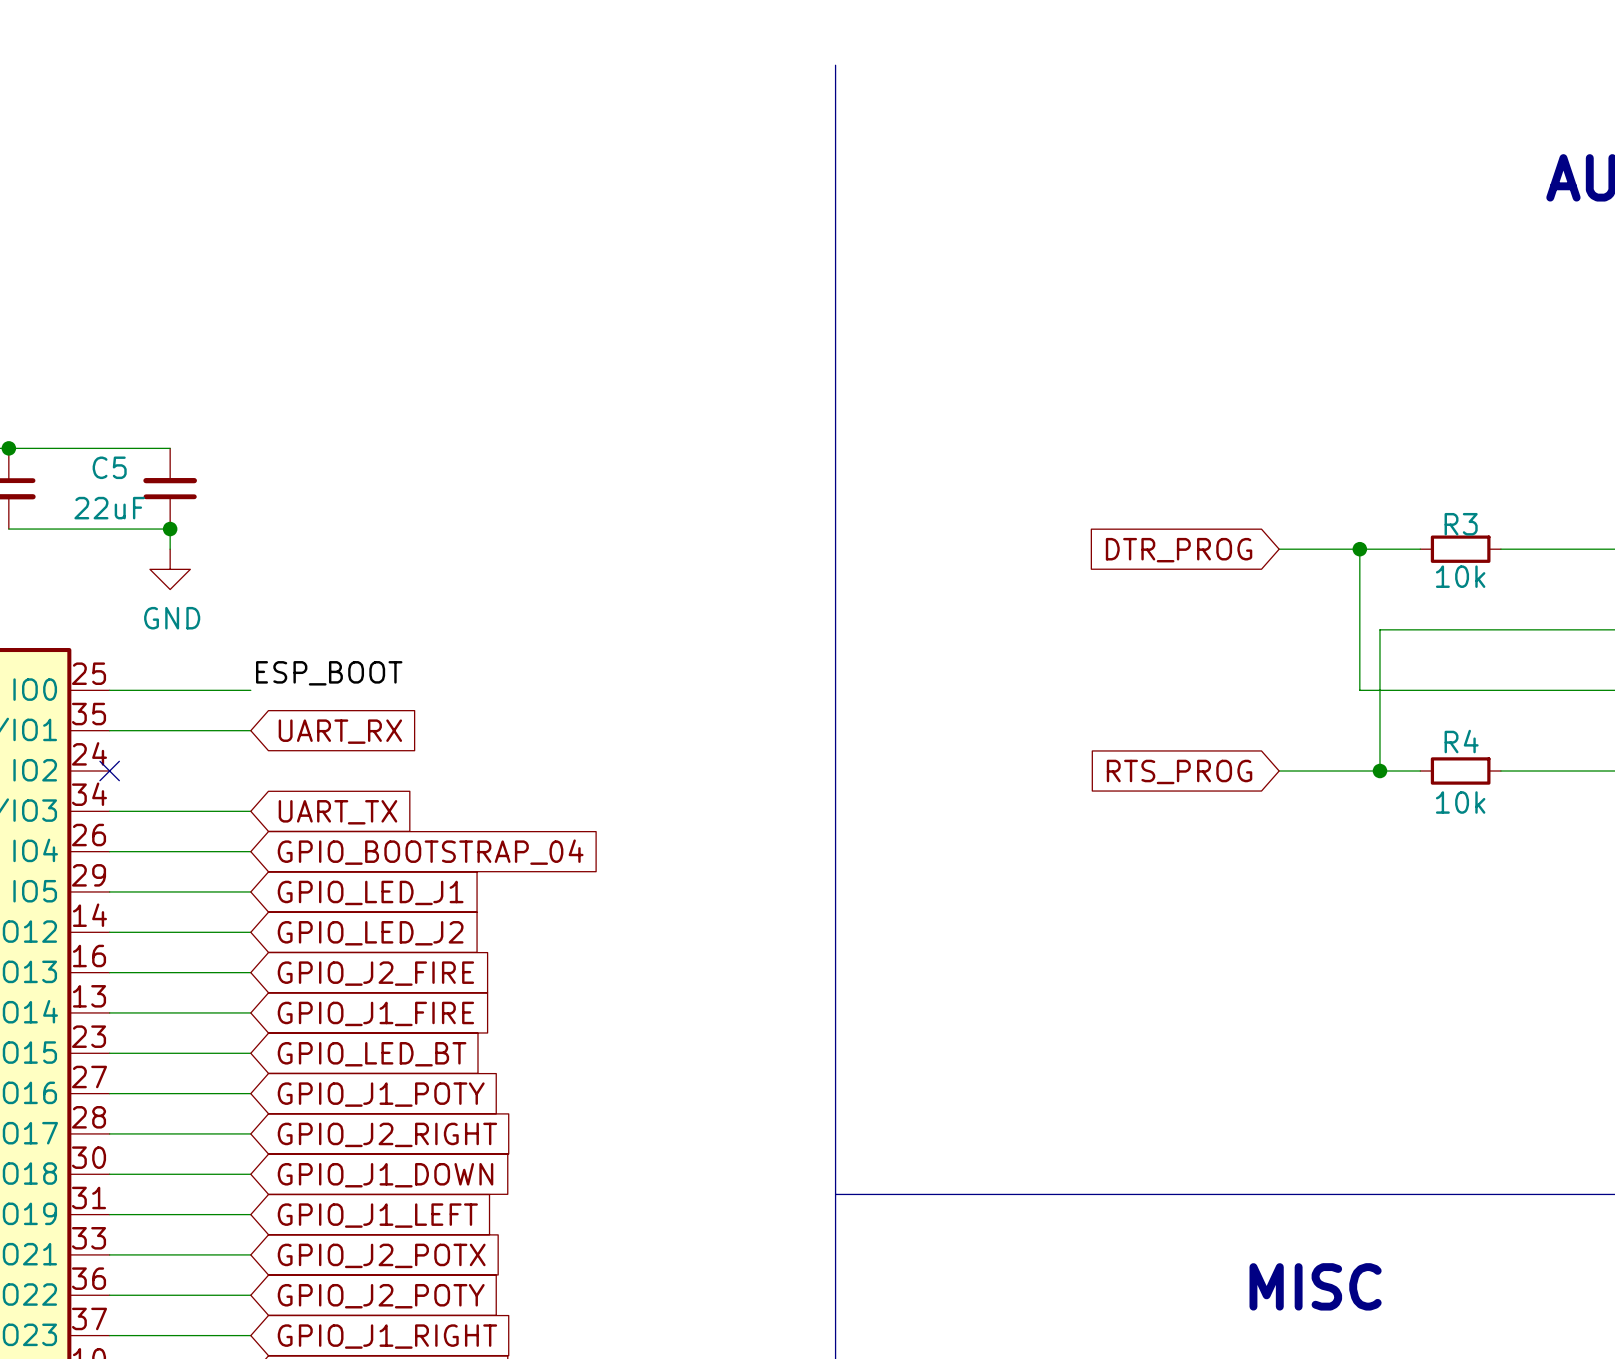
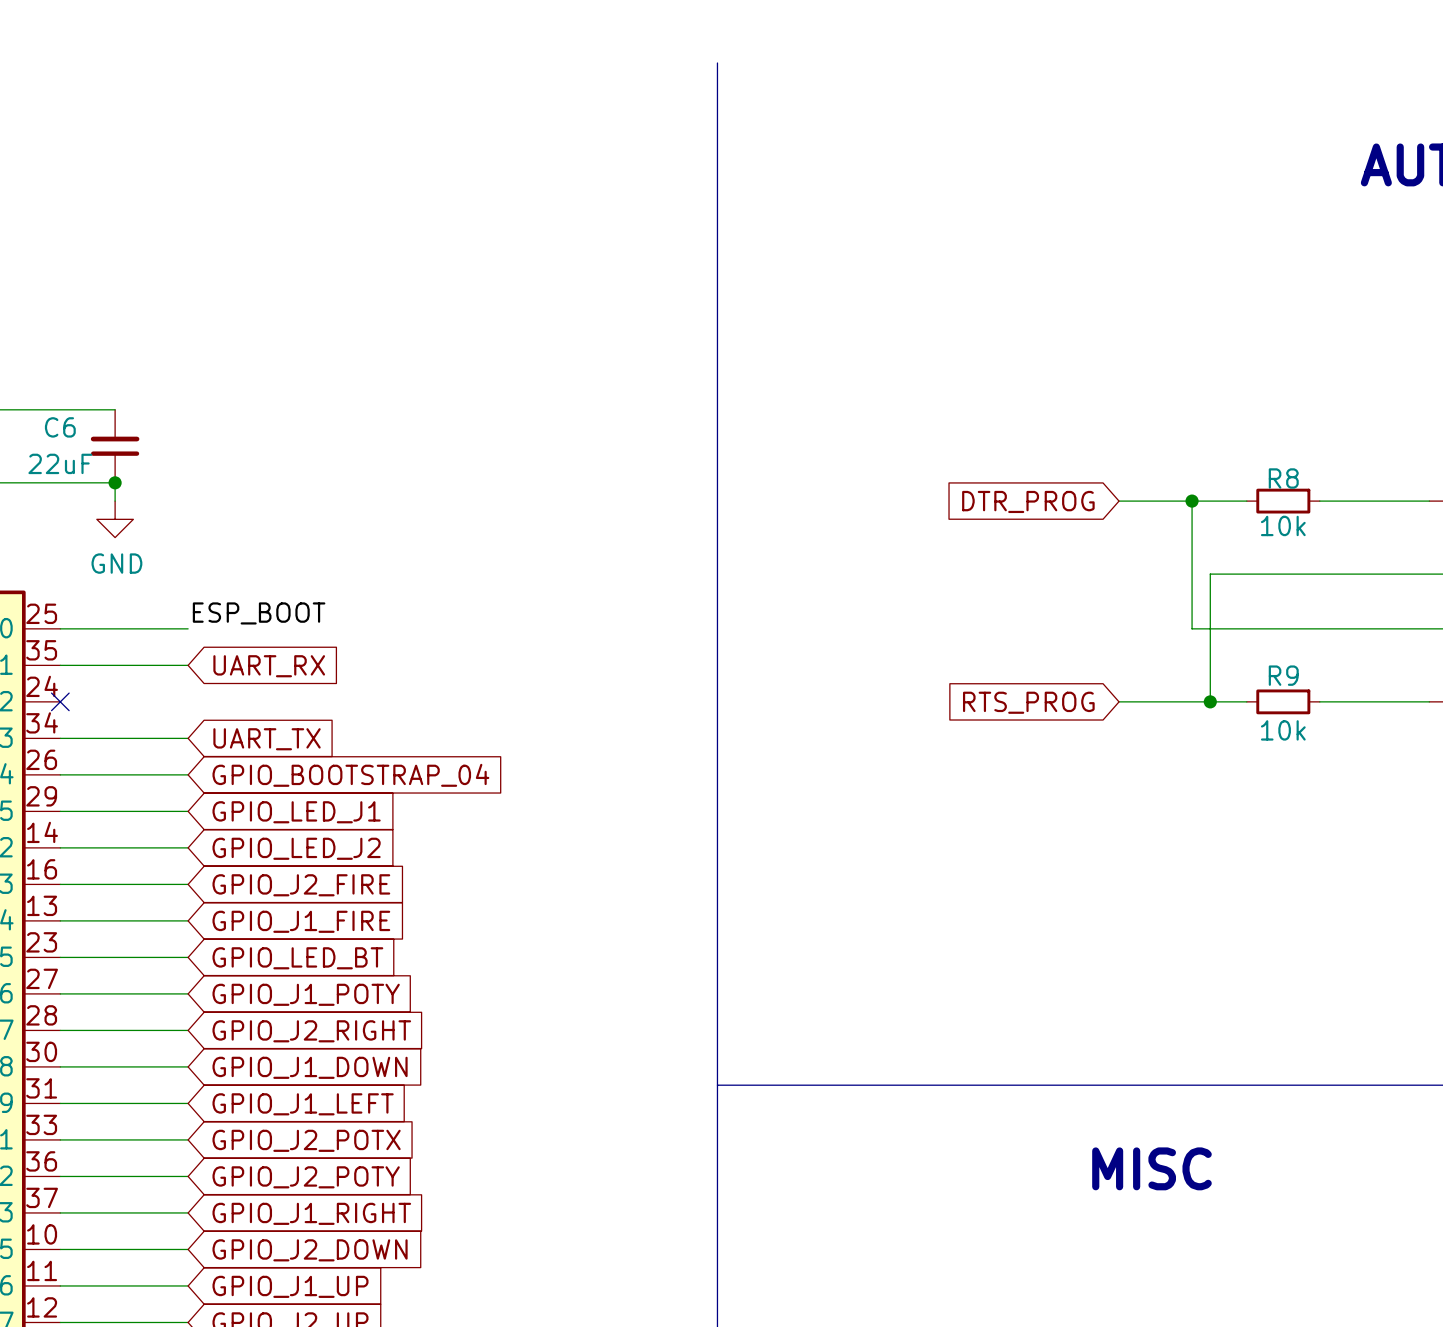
C5 name: C5 (109, 467) -> C6 (60, 427)
R3 name: R3 (1461, 524) -> R8 (1283, 478)
R4 name: R4 (1461, 741) -> R9 (1283, 675)

